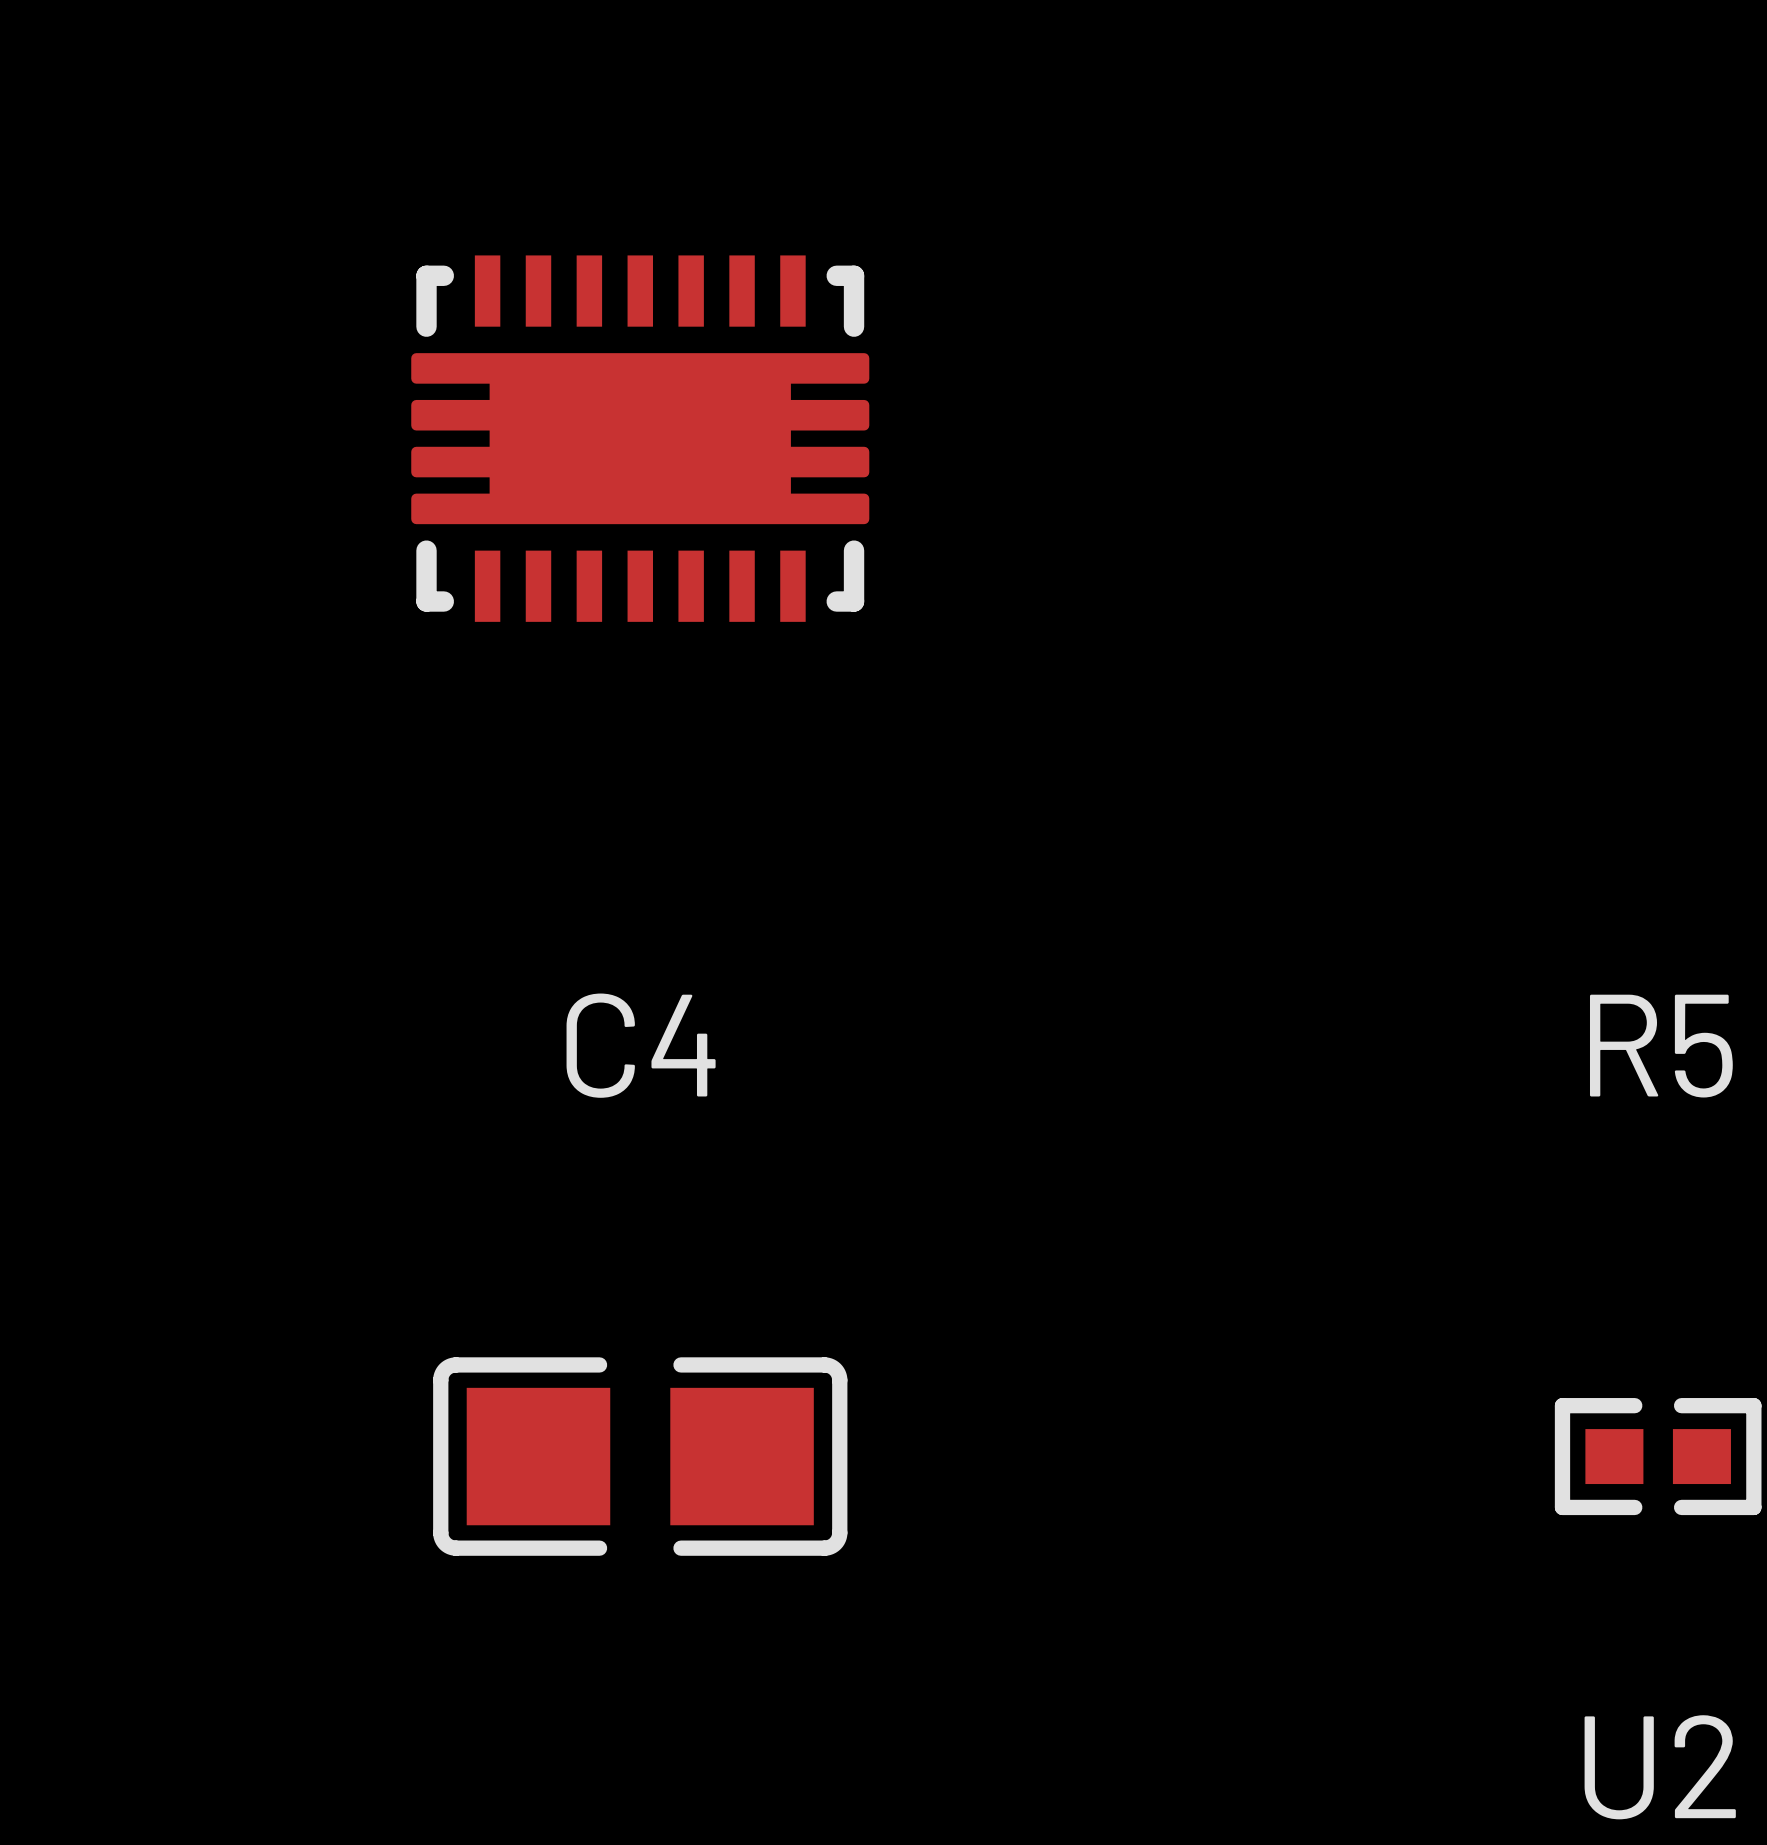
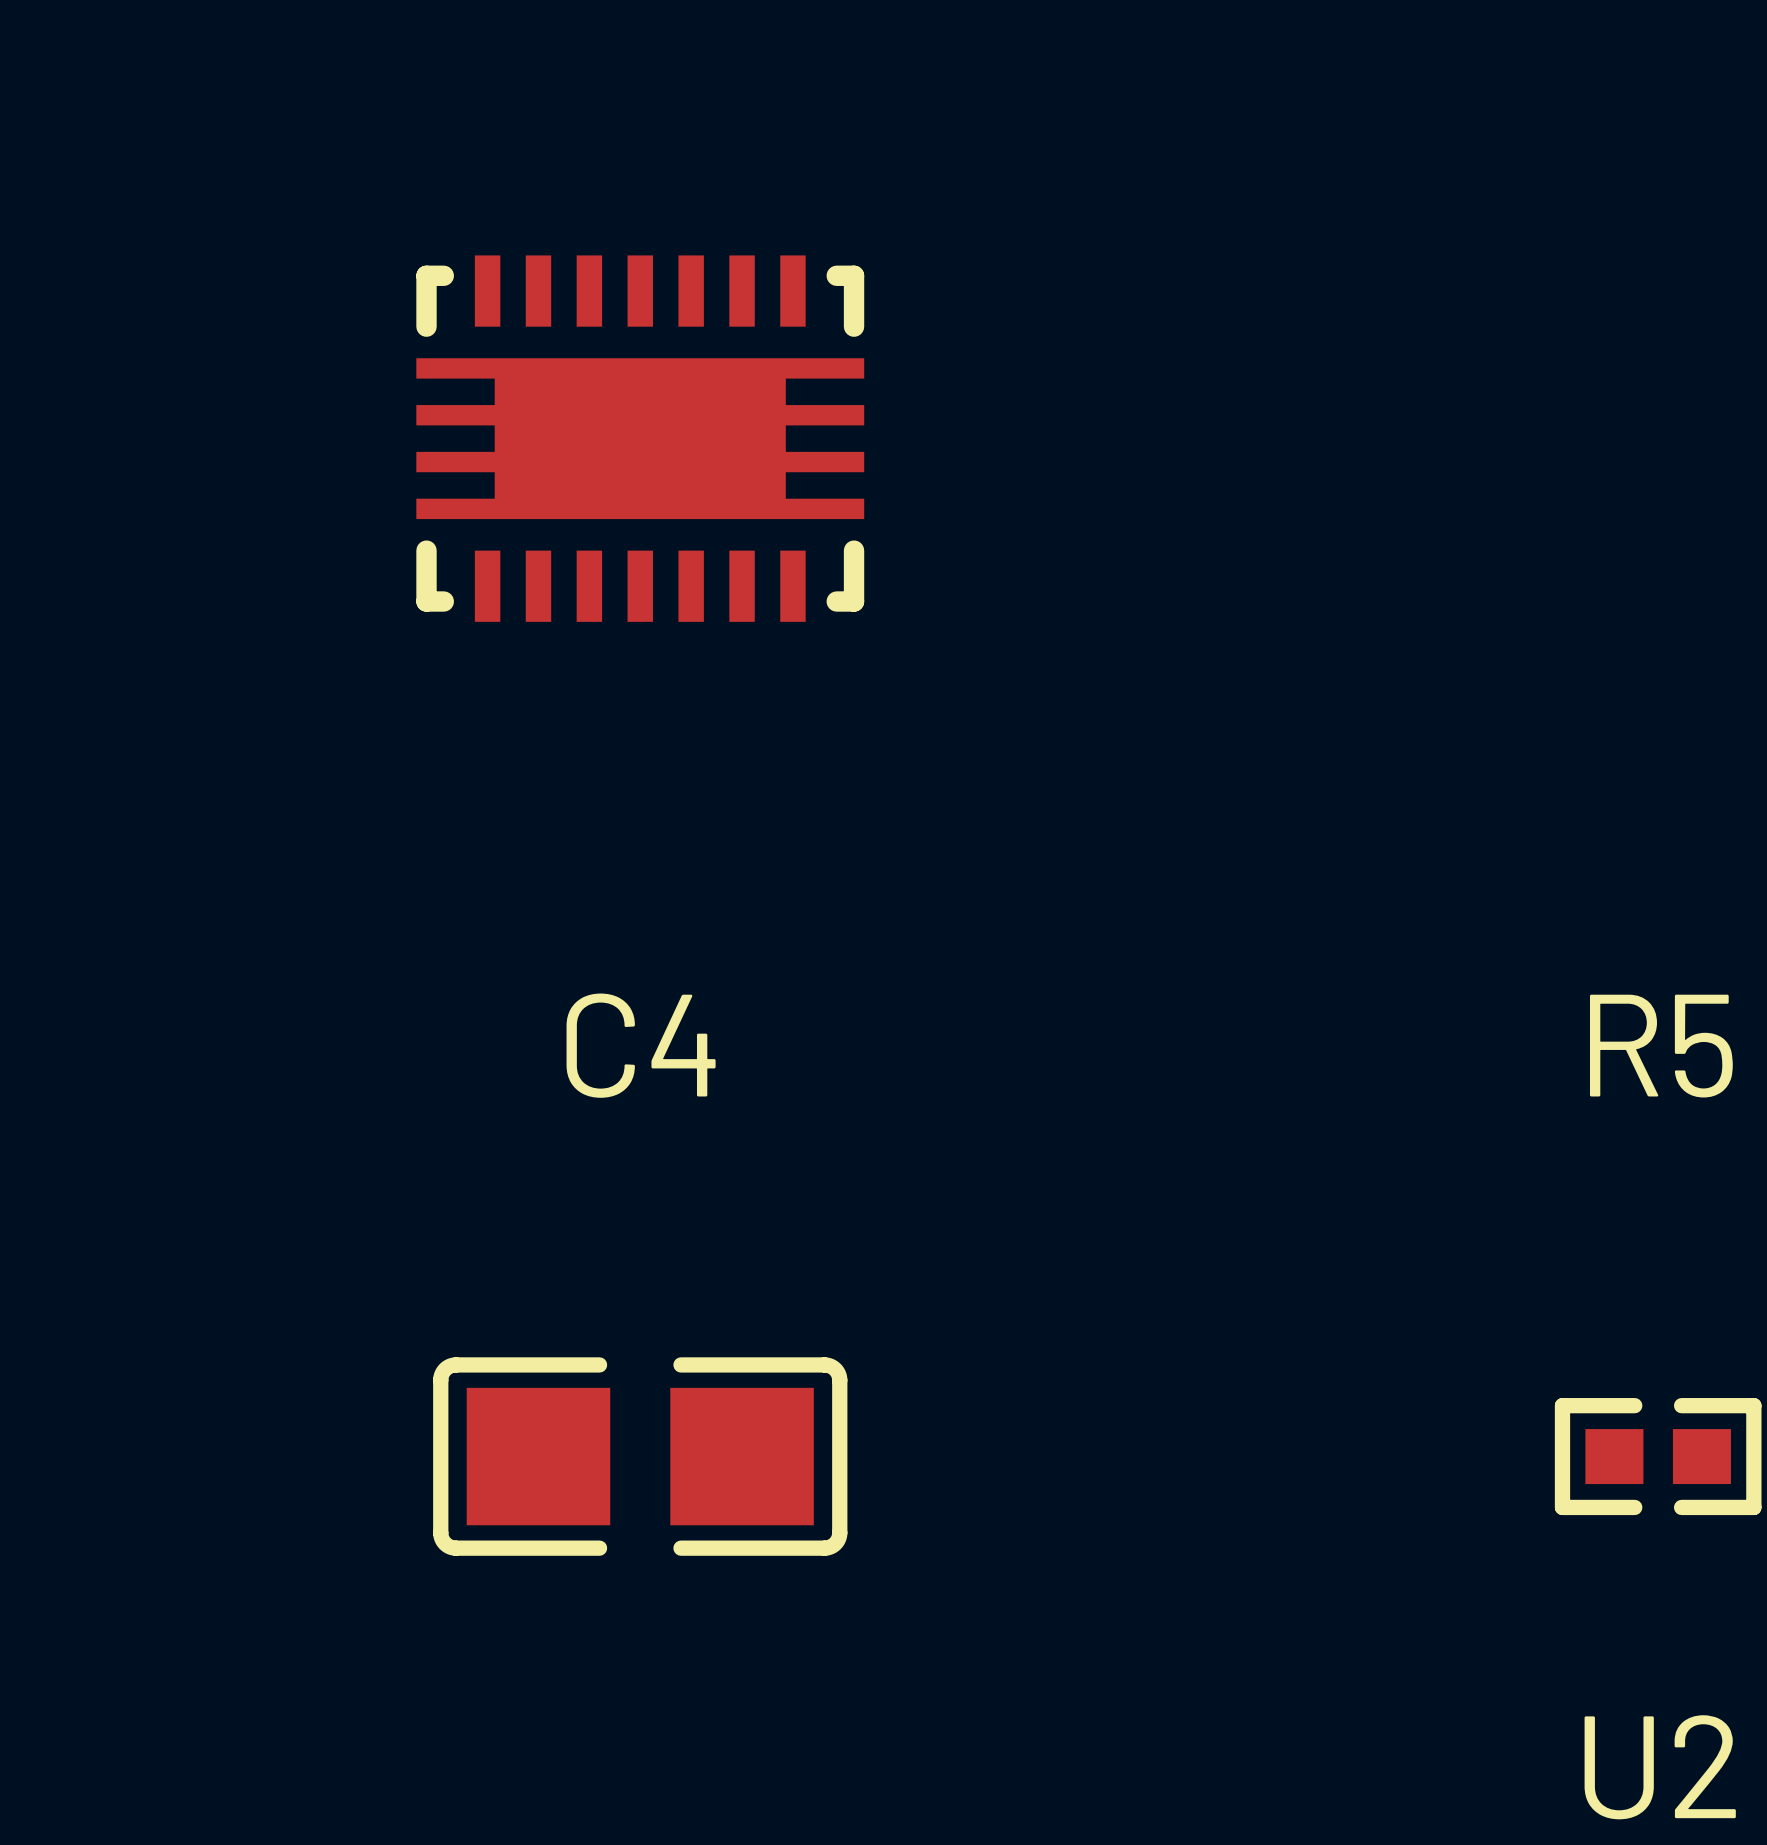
part footprint: [411, 255, 870, 652] -> [416, 255, 865, 652]

